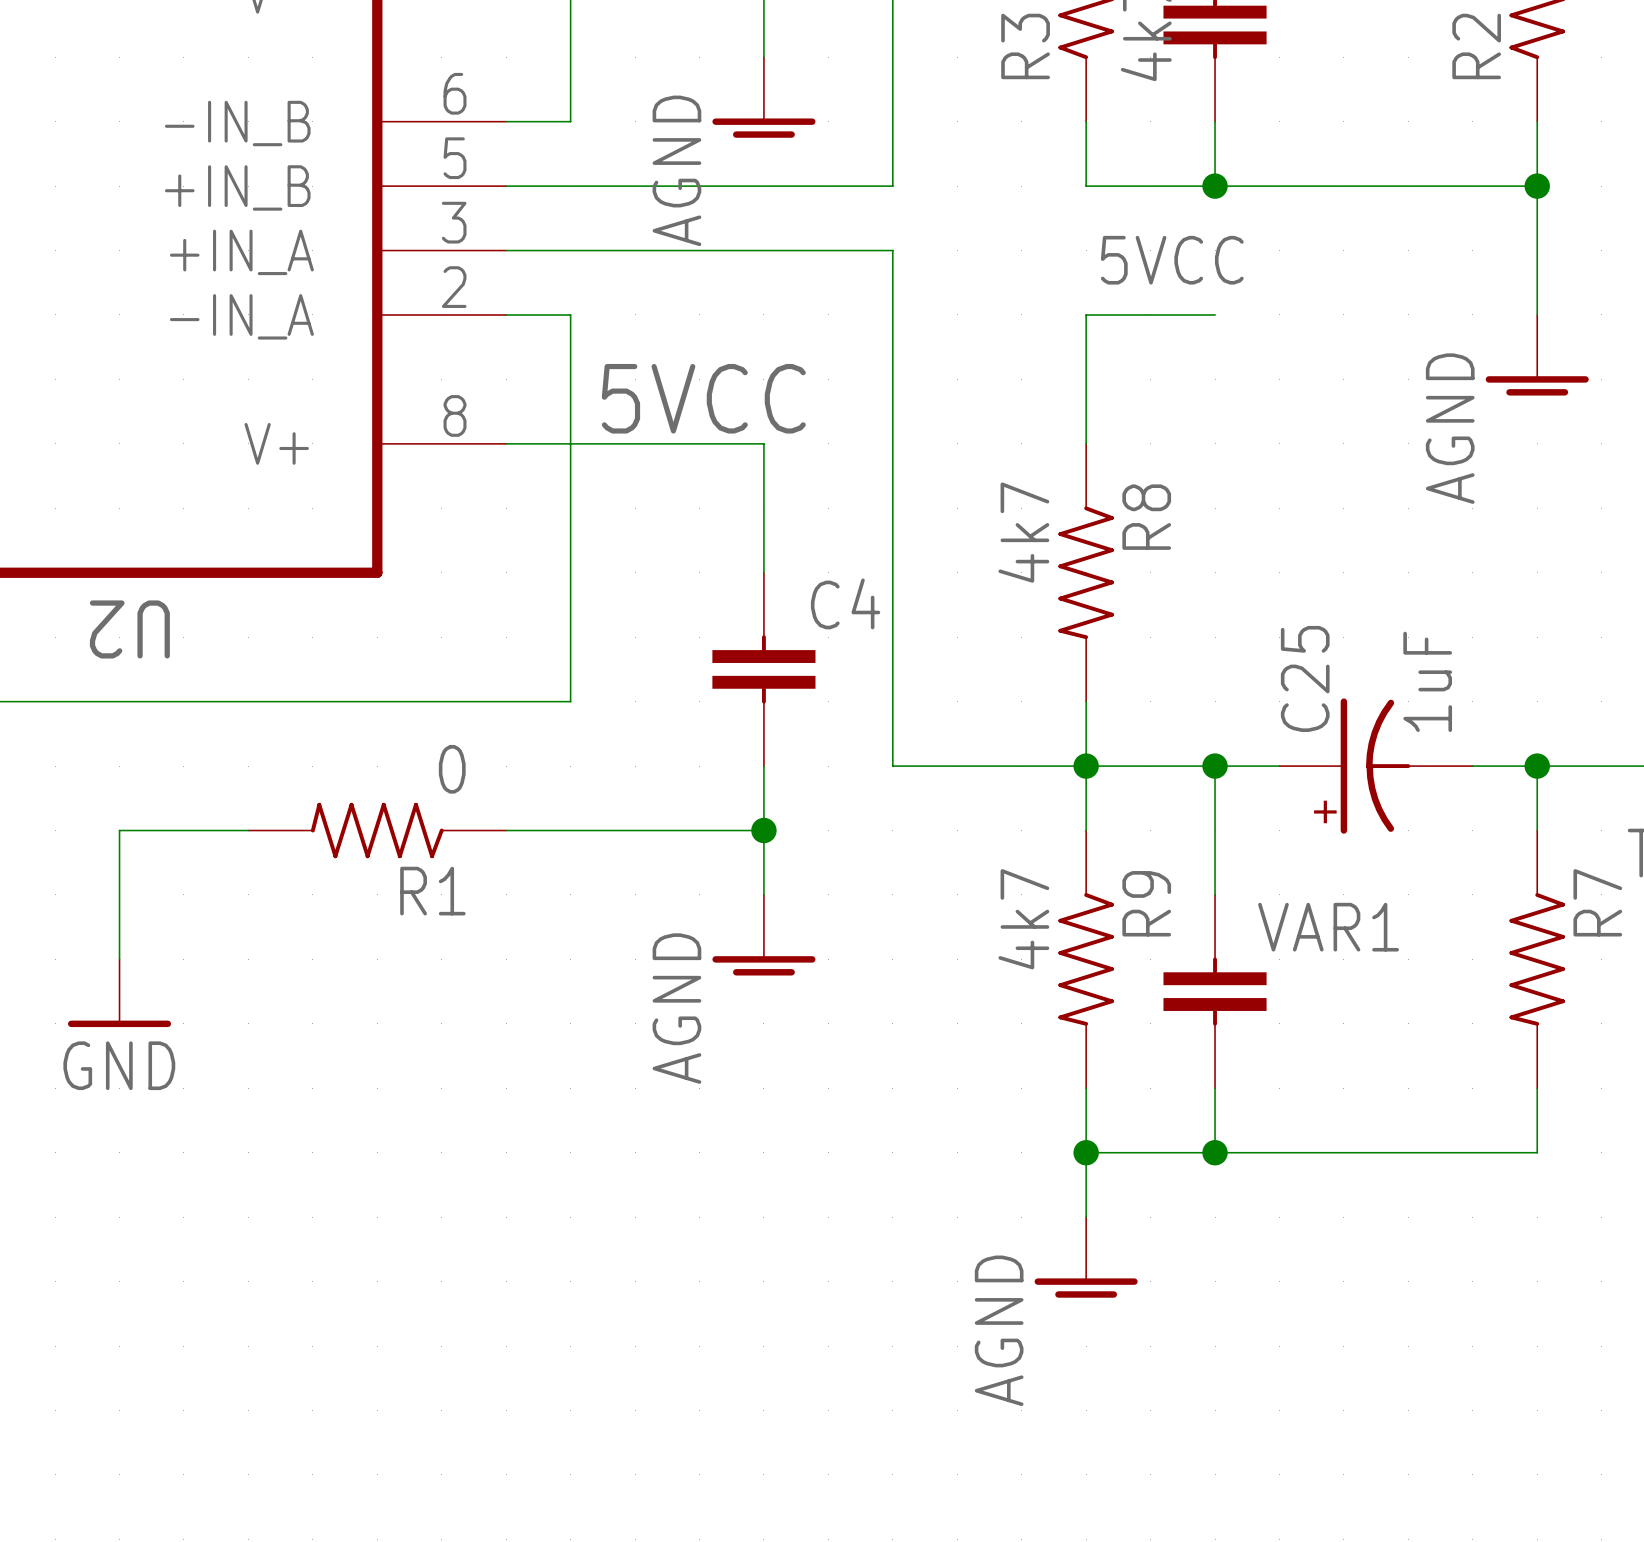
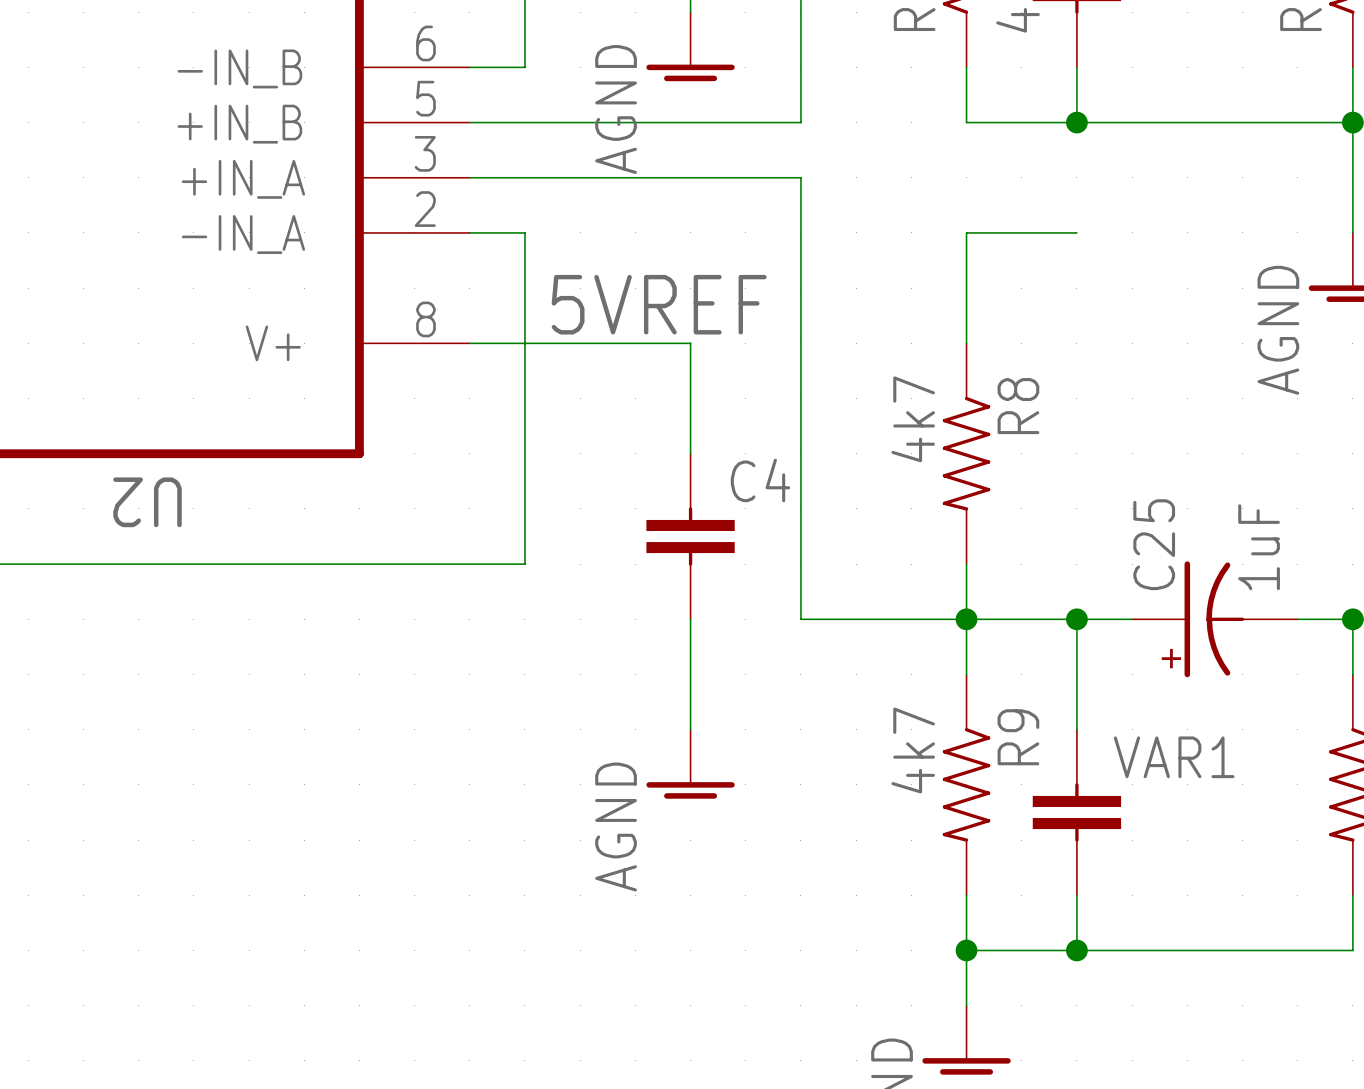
label: 5VCC (1172, 260) -> none
label: 5VCC (703, 398) -> 5VREF (659, 304)
wire: (248, 830) (119, 830) (119, 959) -> none
R1: 0 (377, 830) -> none
wire: (506, 830) (763, 830) -> none
junction: (763, 830) -> none
power symbol: GND (119, 993) -> none

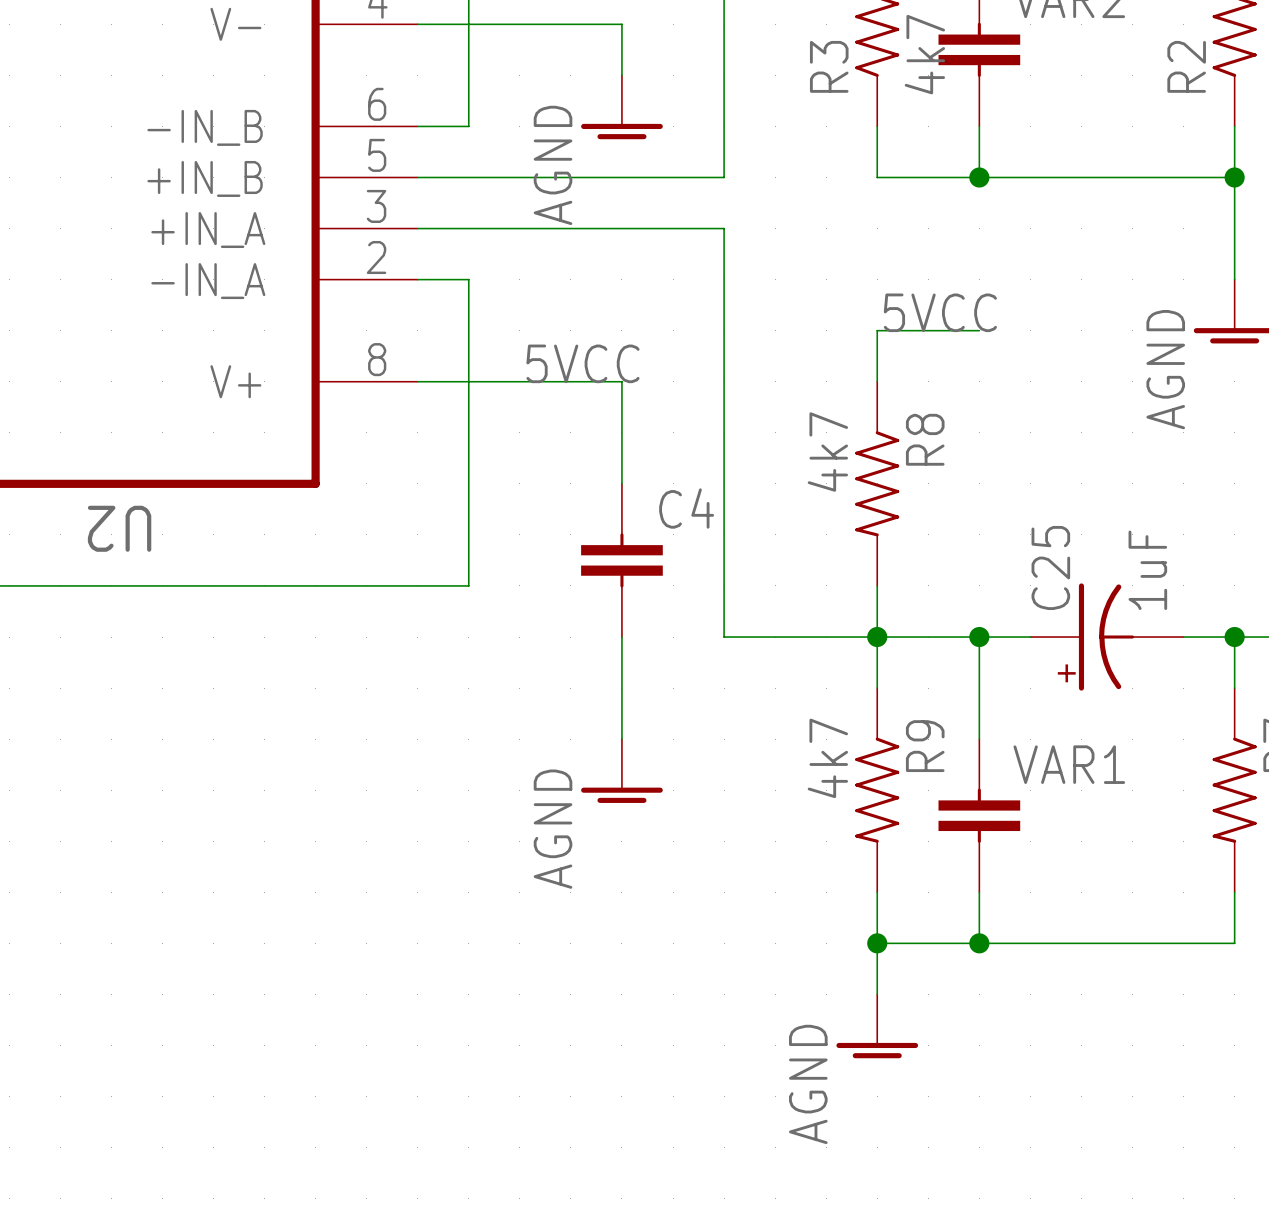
wire: (1076, 232) (966, 232) (966, 288) -> (979, 330) (877, 330)
label: none -> 5VCC (940, 312)
label: 5VREF (659, 304) -> none
label: none -> 5VCC (582, 363)

